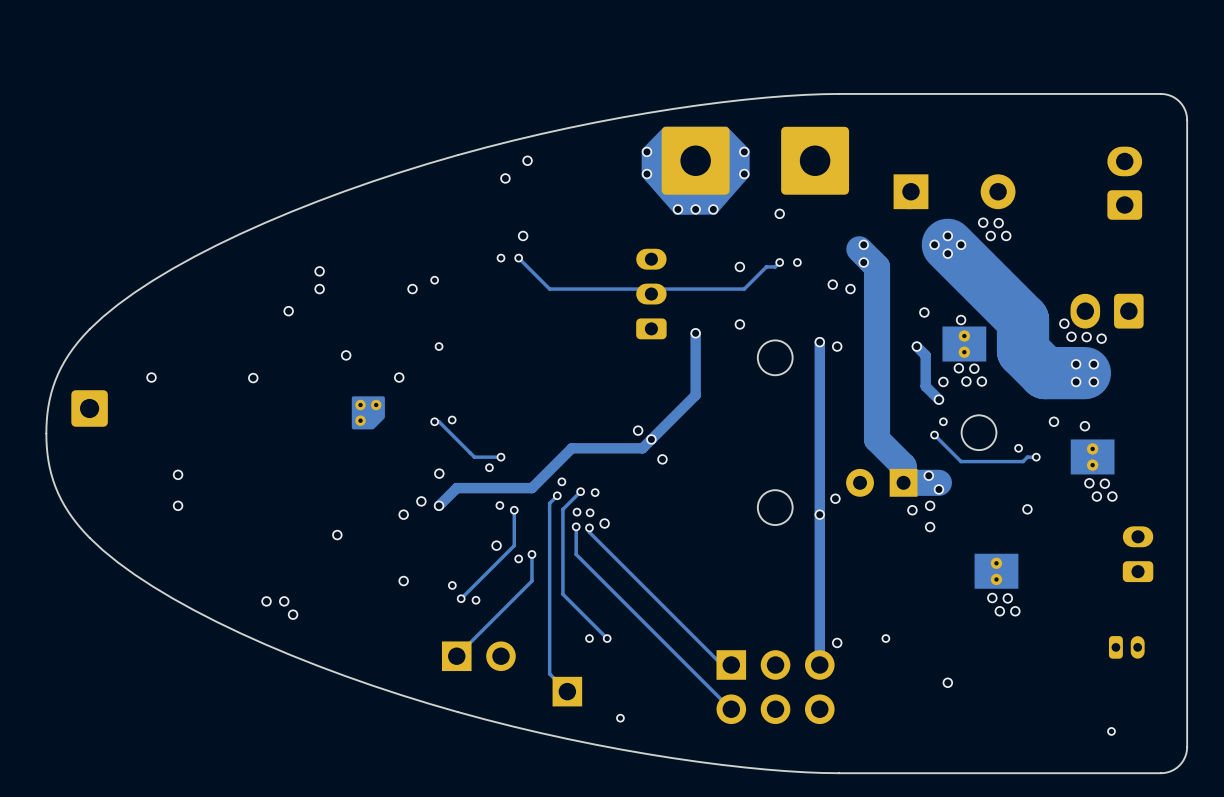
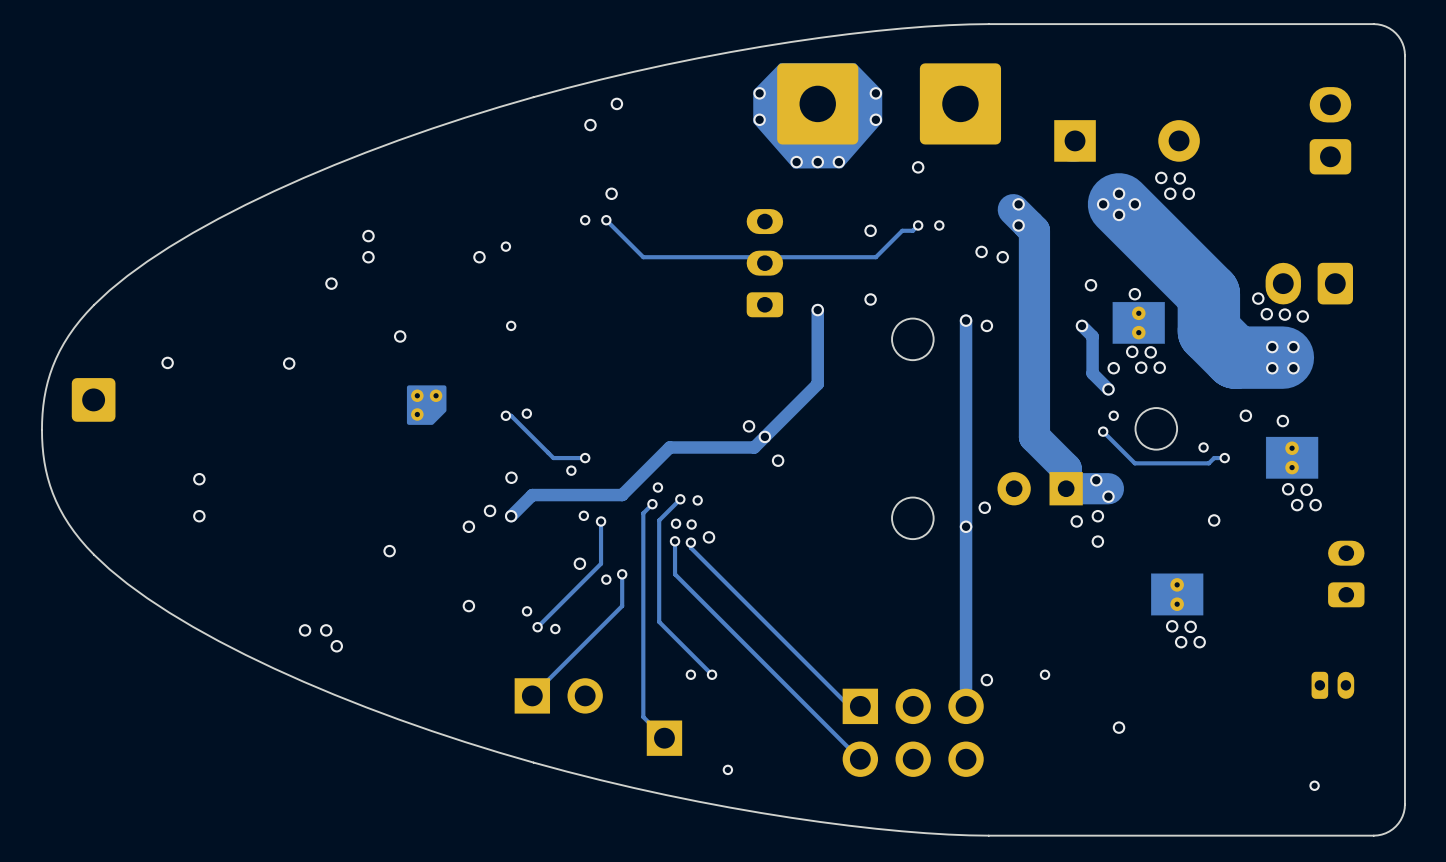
via: (399, 377) -> none

